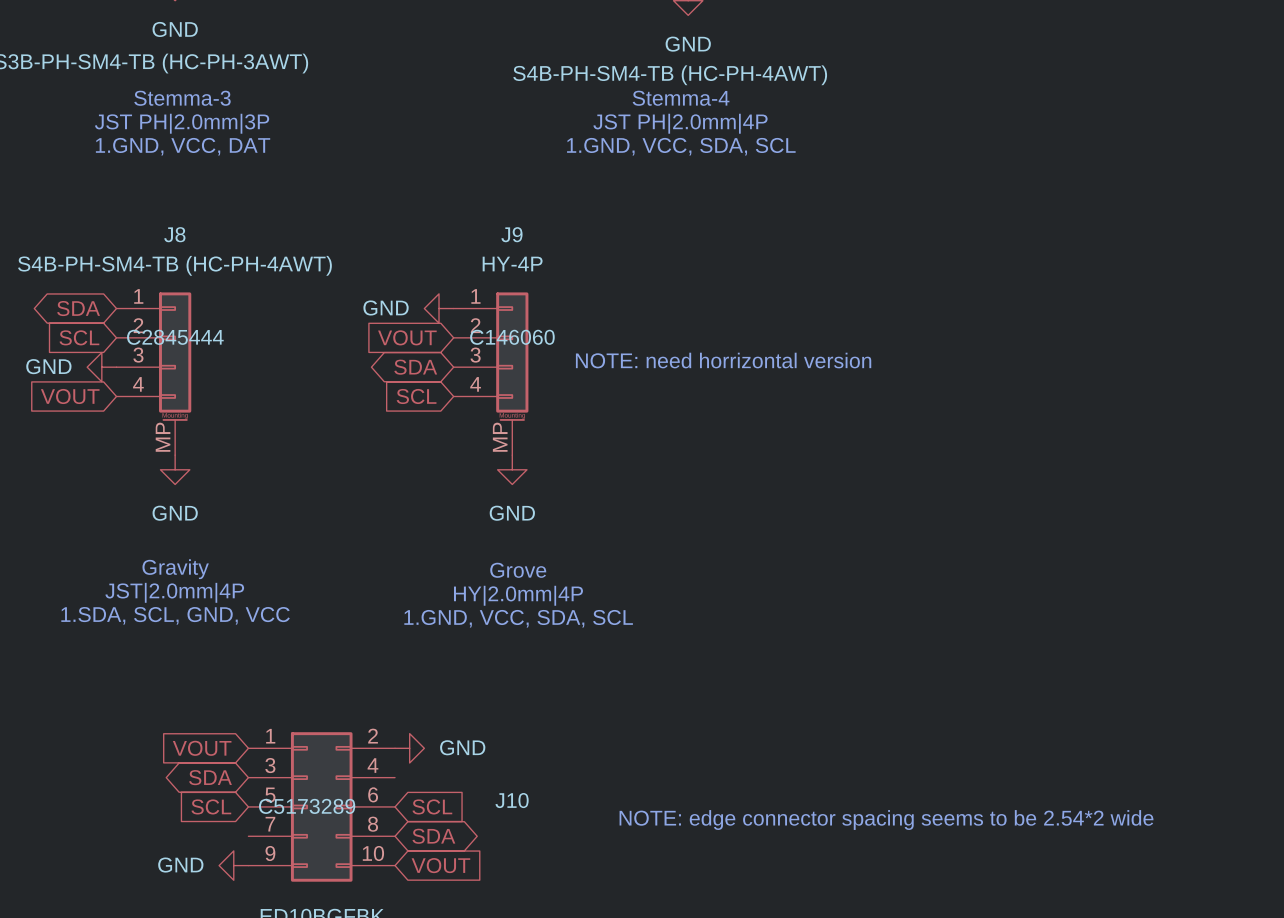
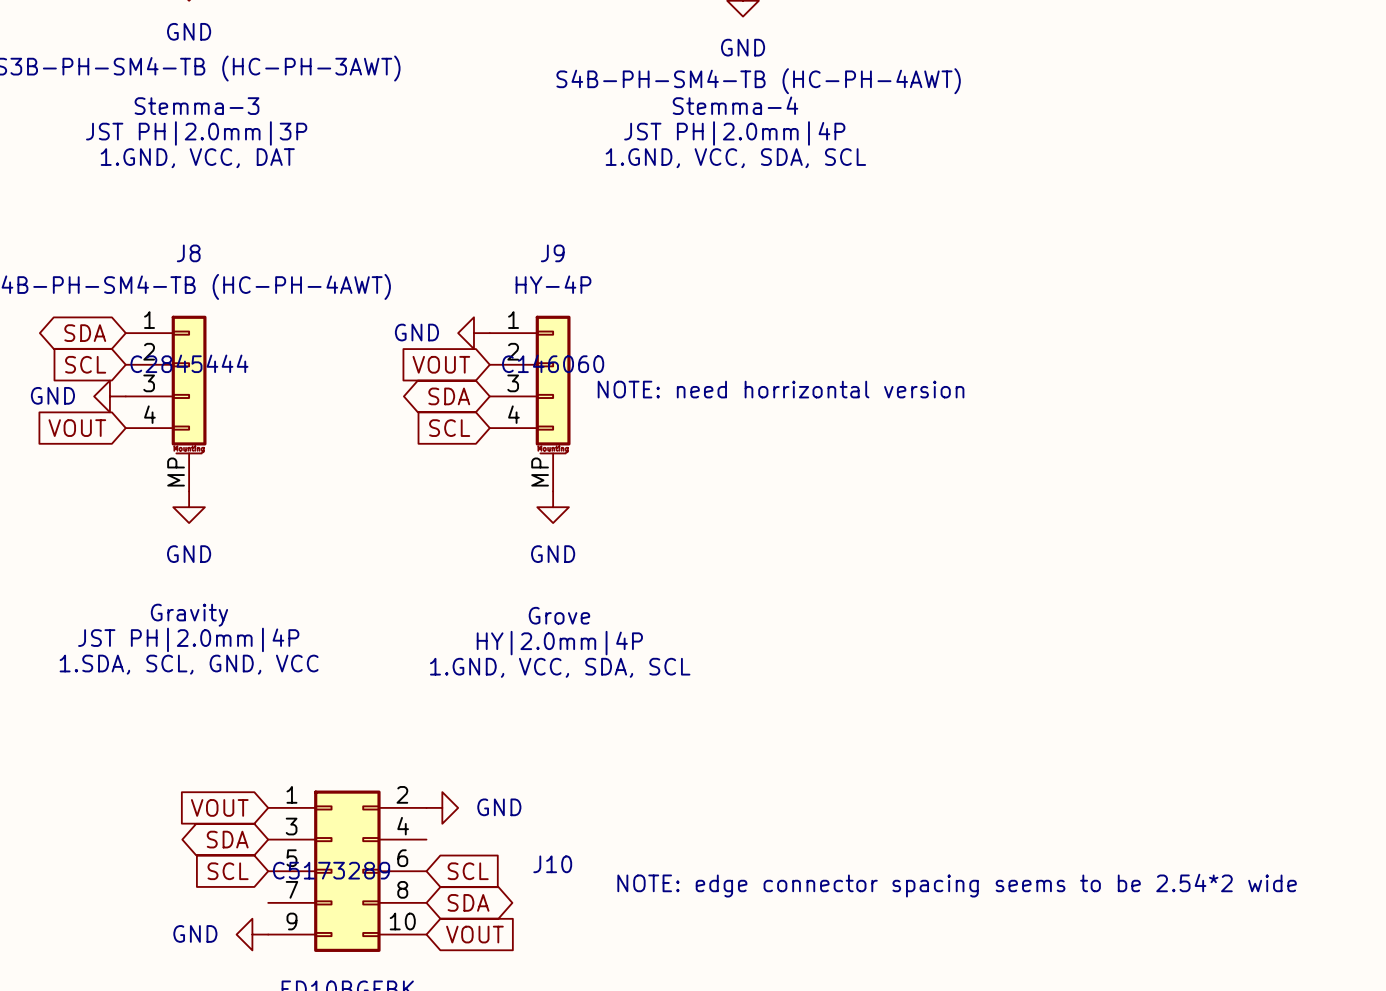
text: JST|2.0mm|4P (174, 592) -> JST PH|2.0mm|4P (188, 639)

